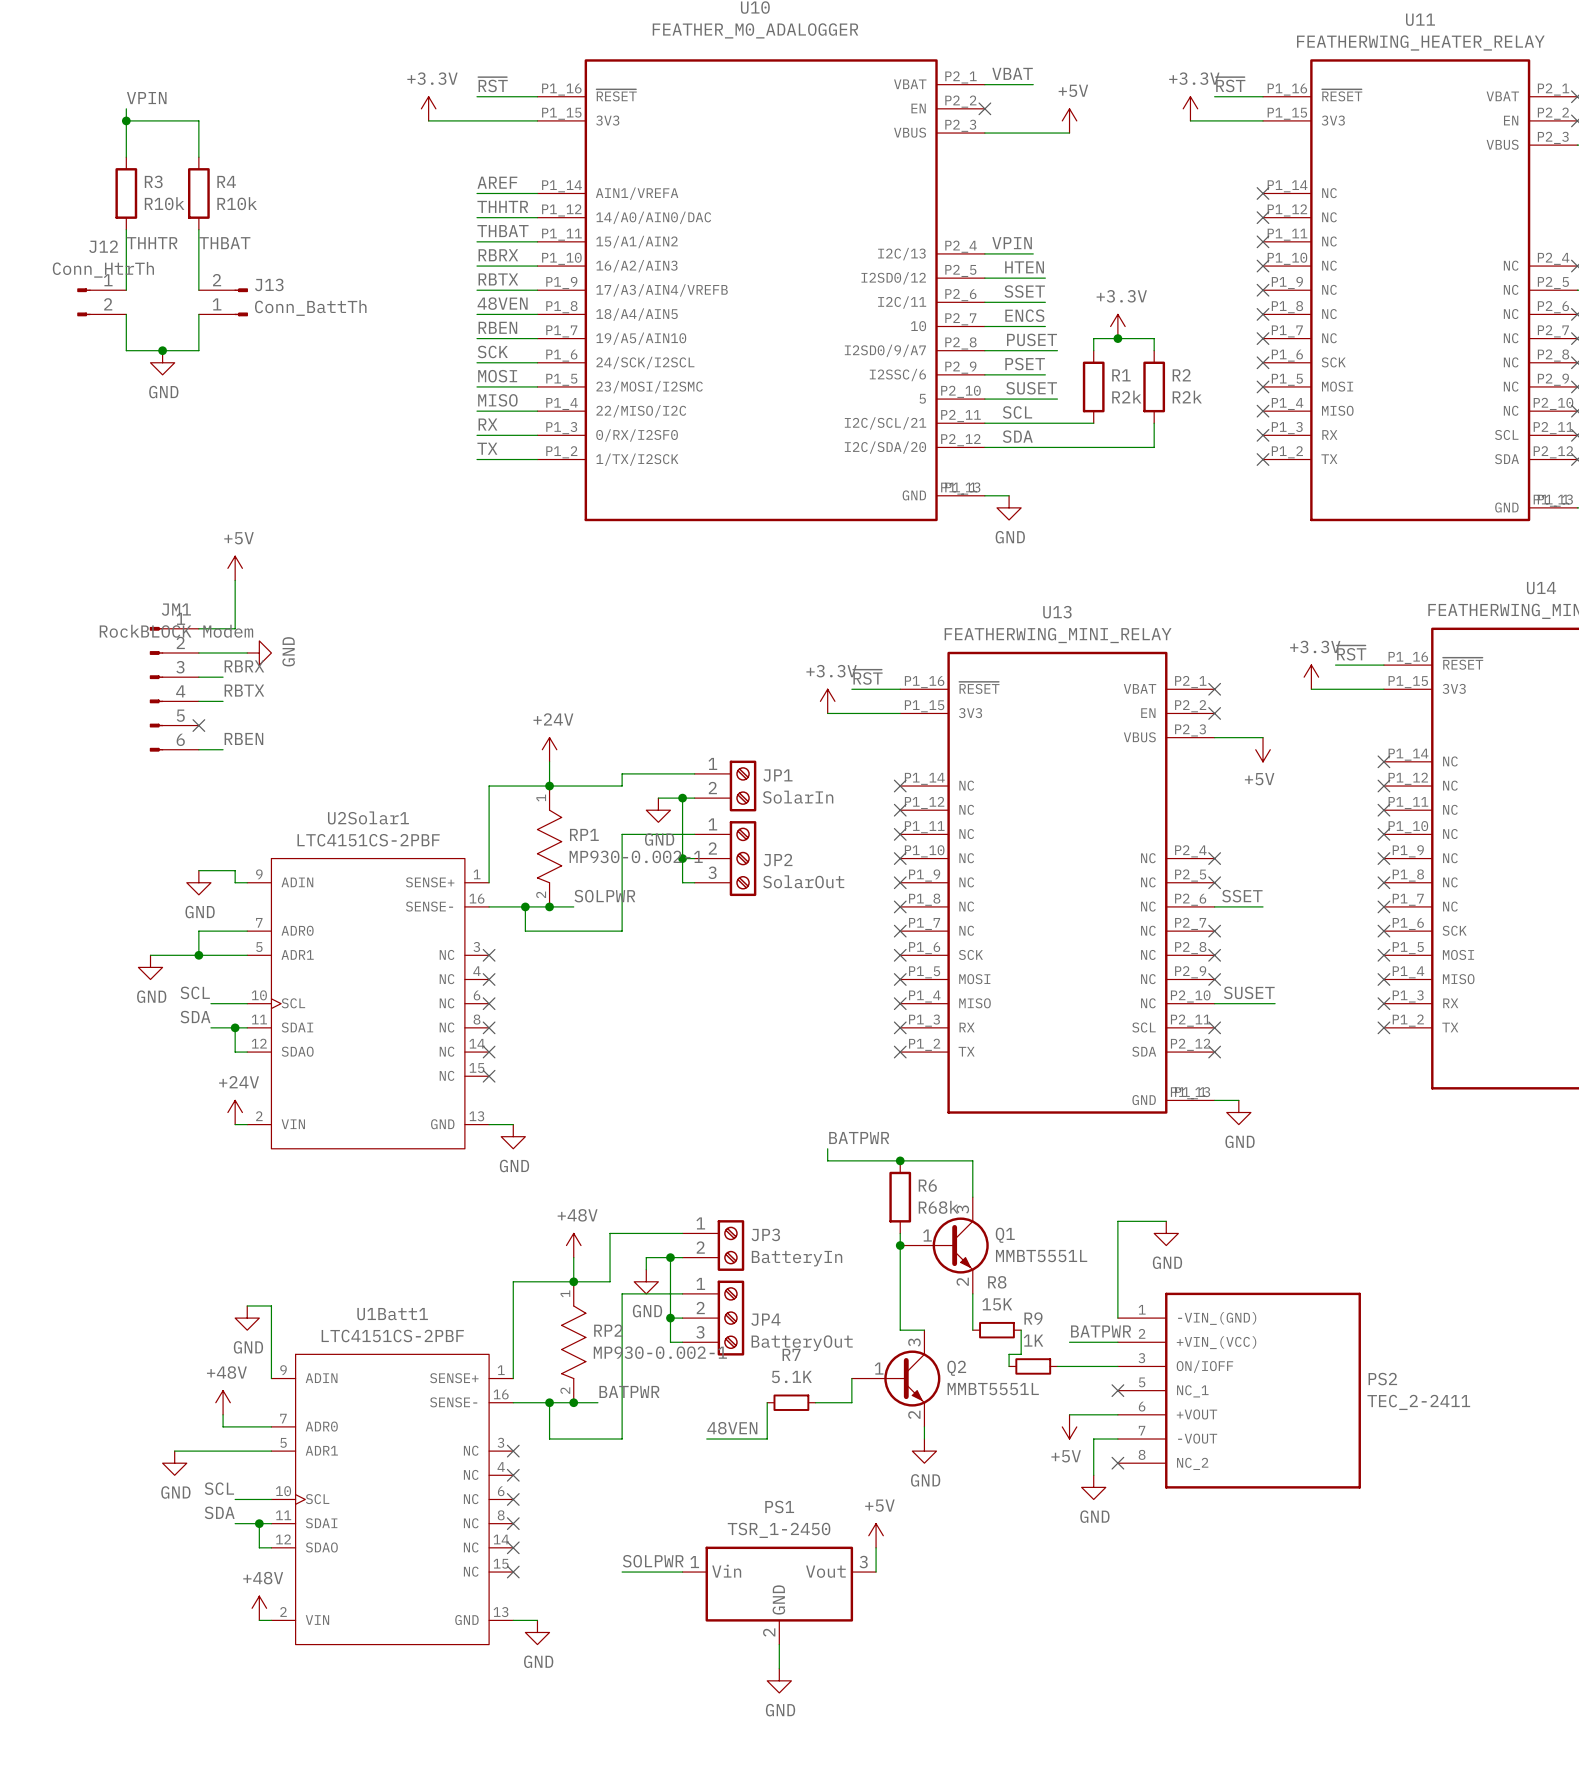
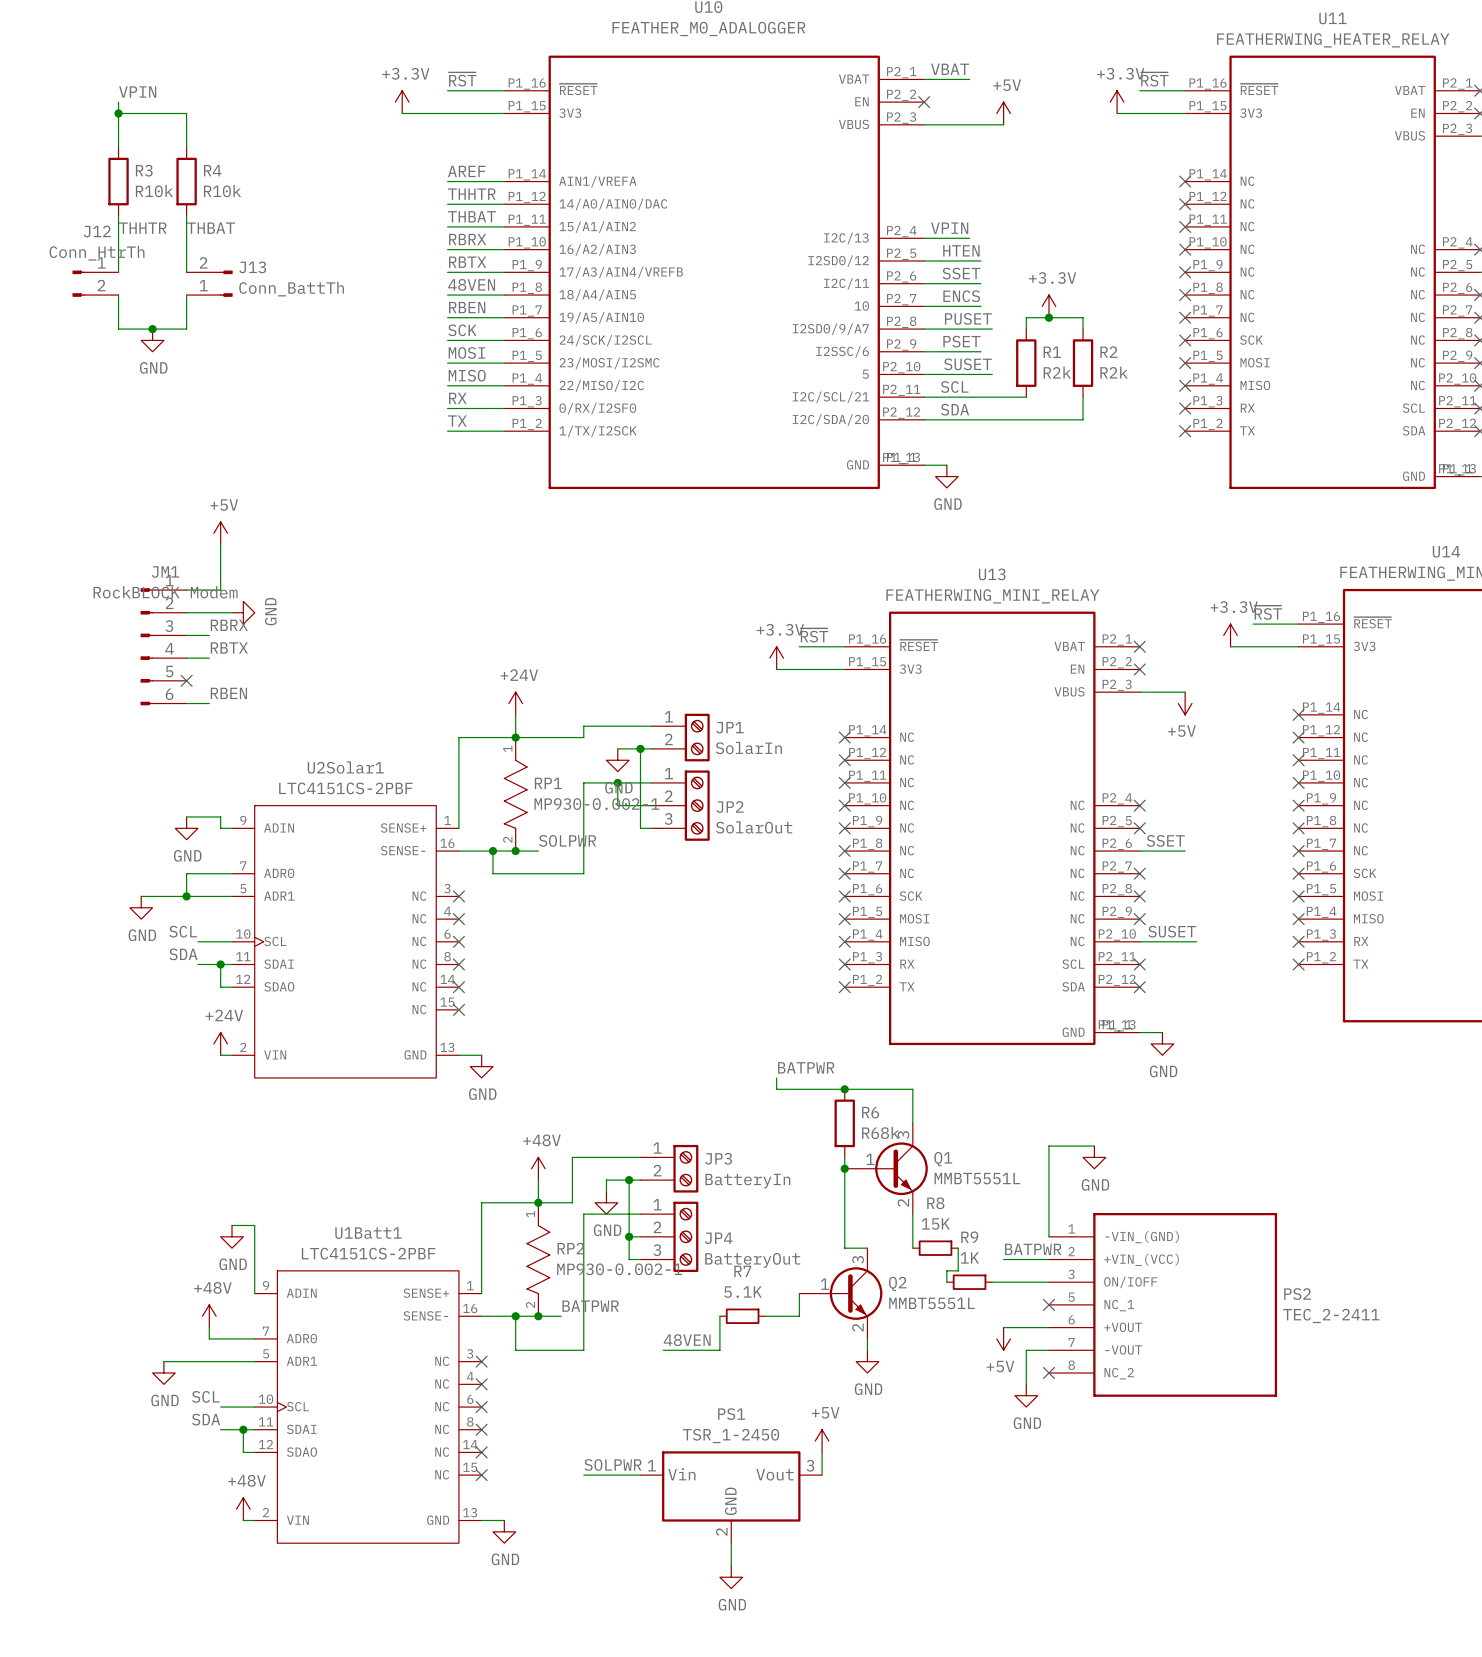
wire: none -> (617, 782) (617, 805) (640, 805)
junction position: (682, 858) -> (617, 782)

